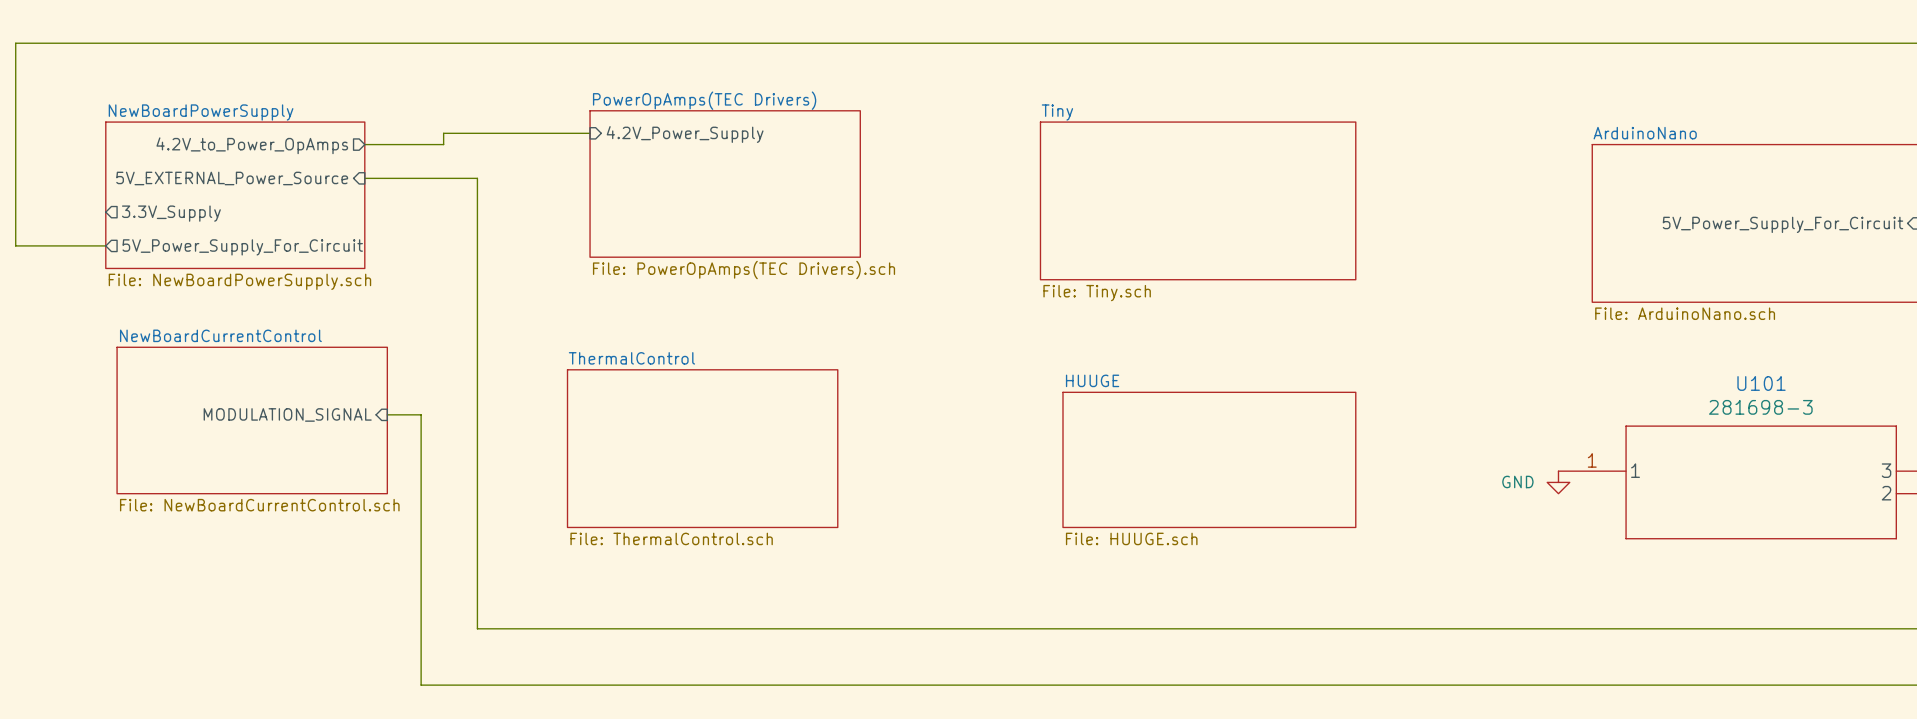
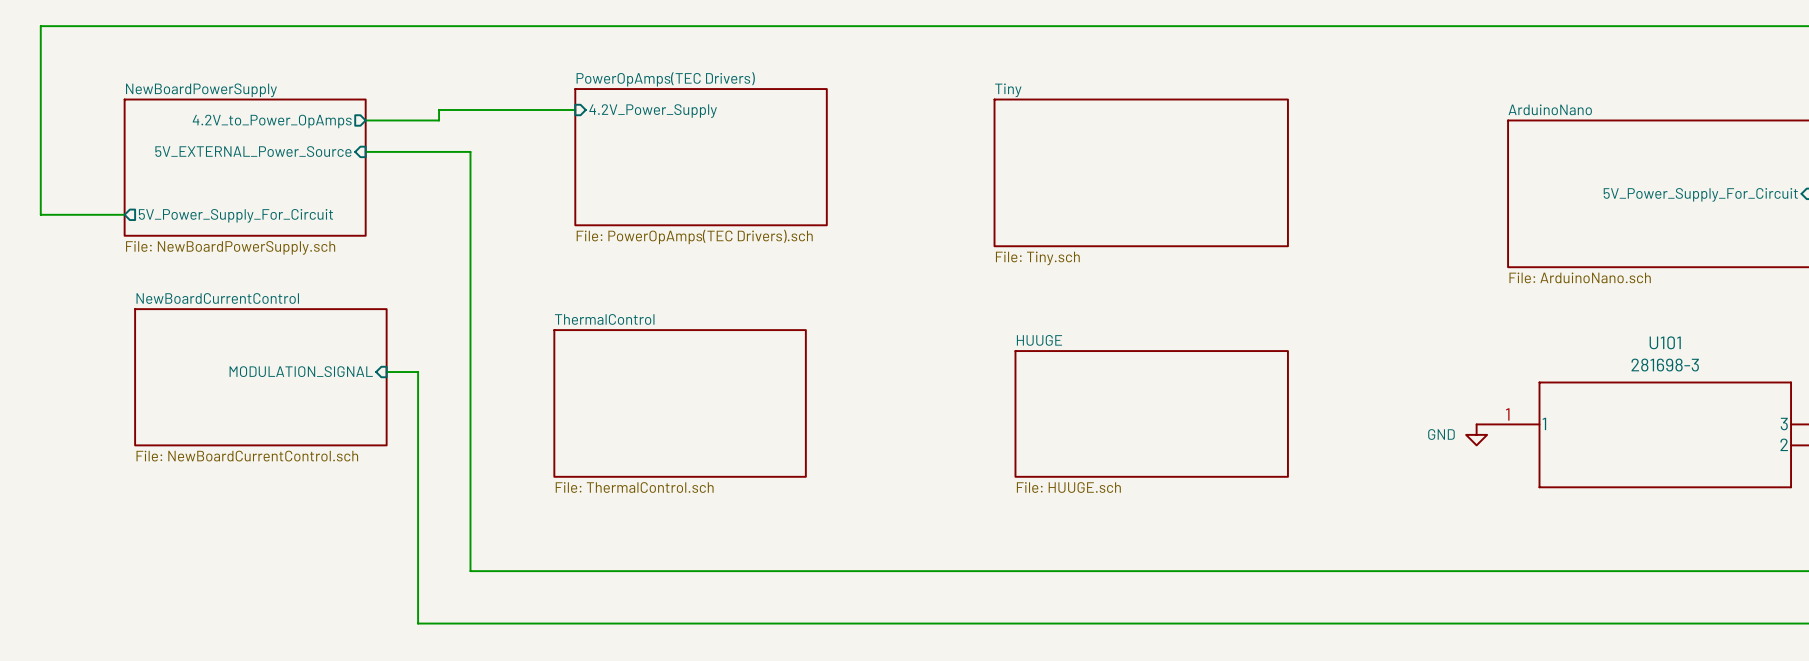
sheet pin: 3.3V_Supply (171, 213) -> none

